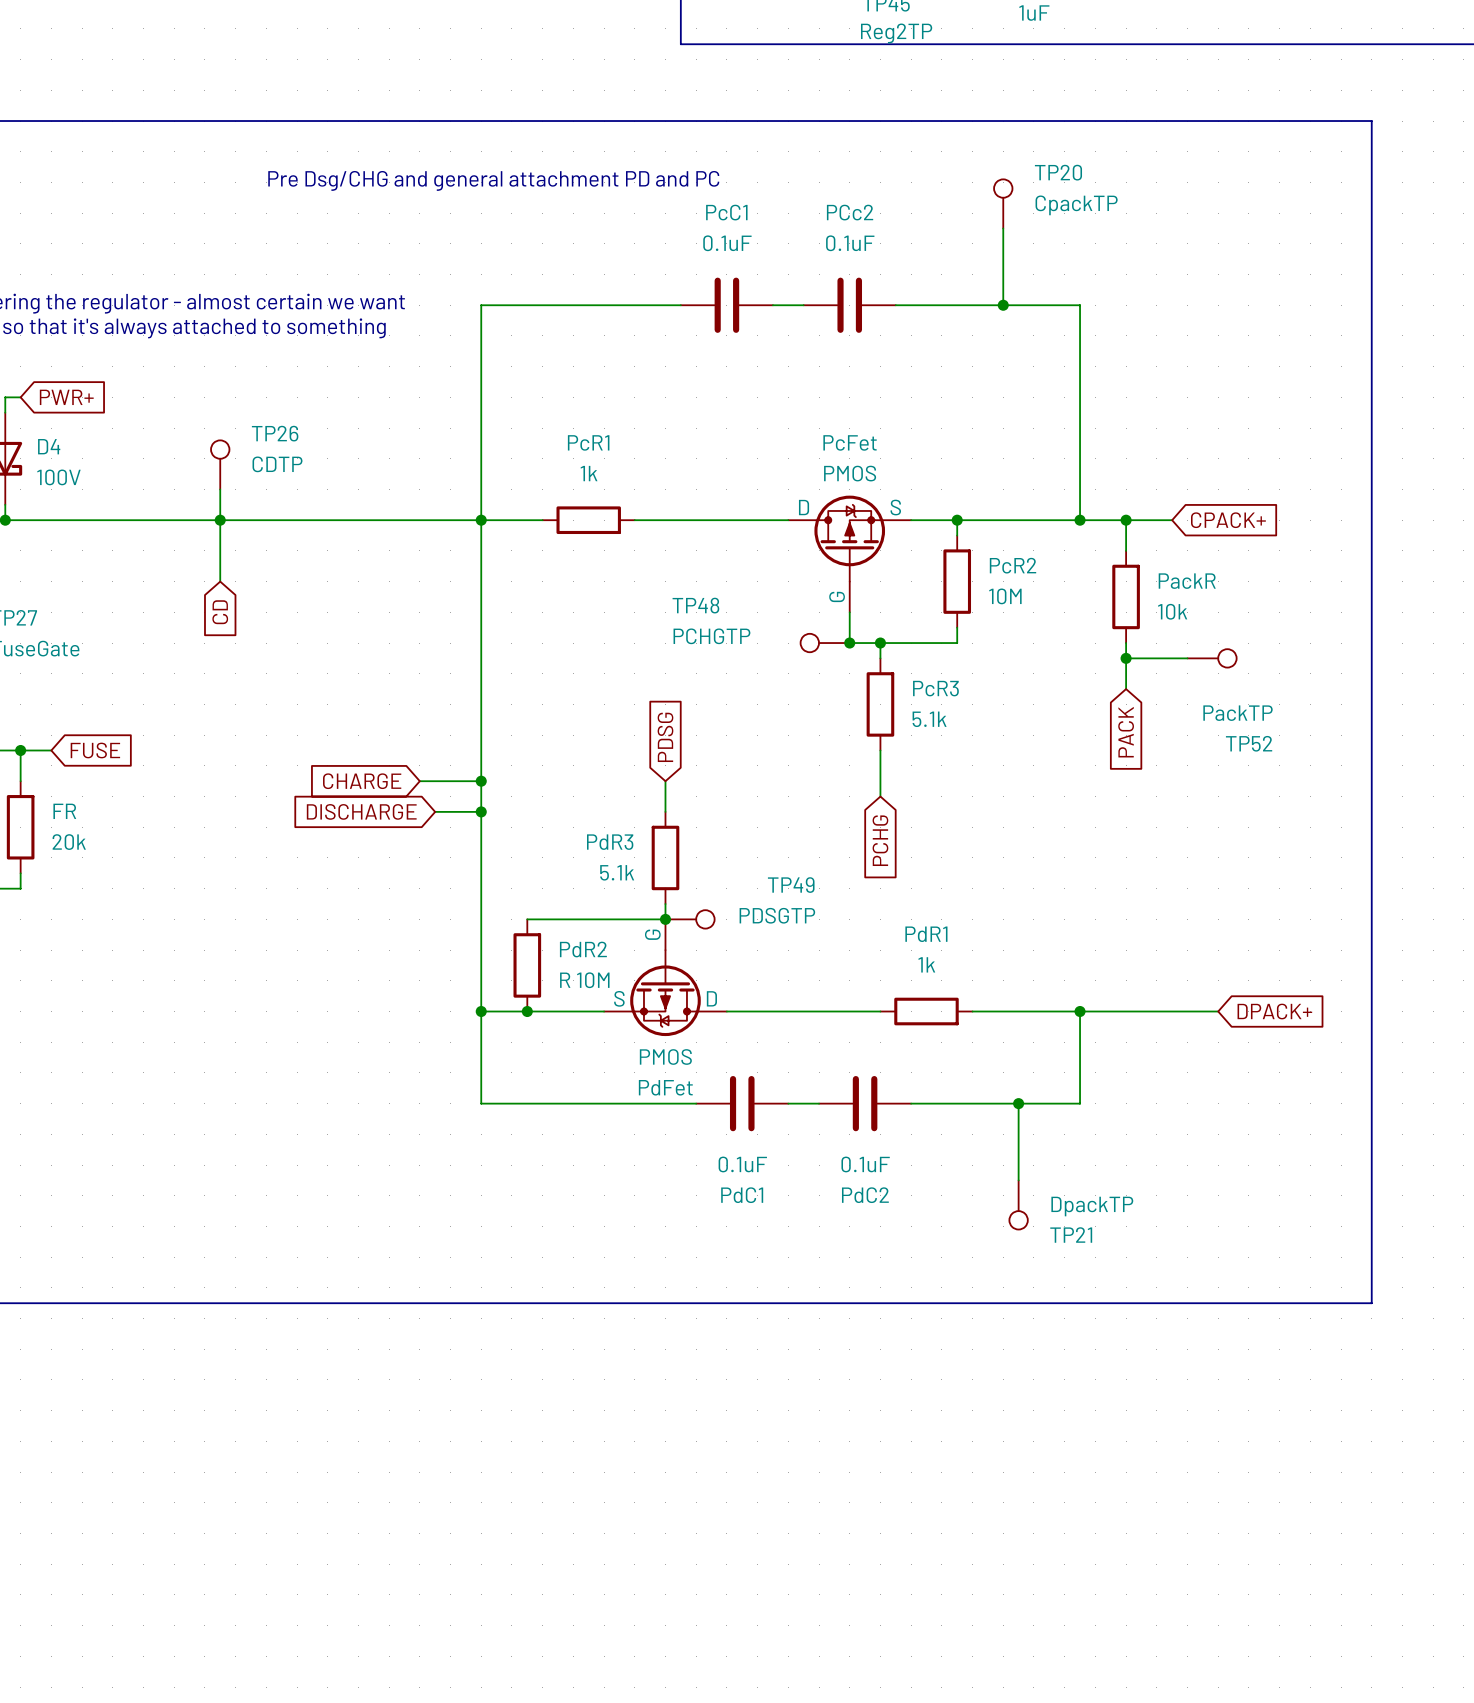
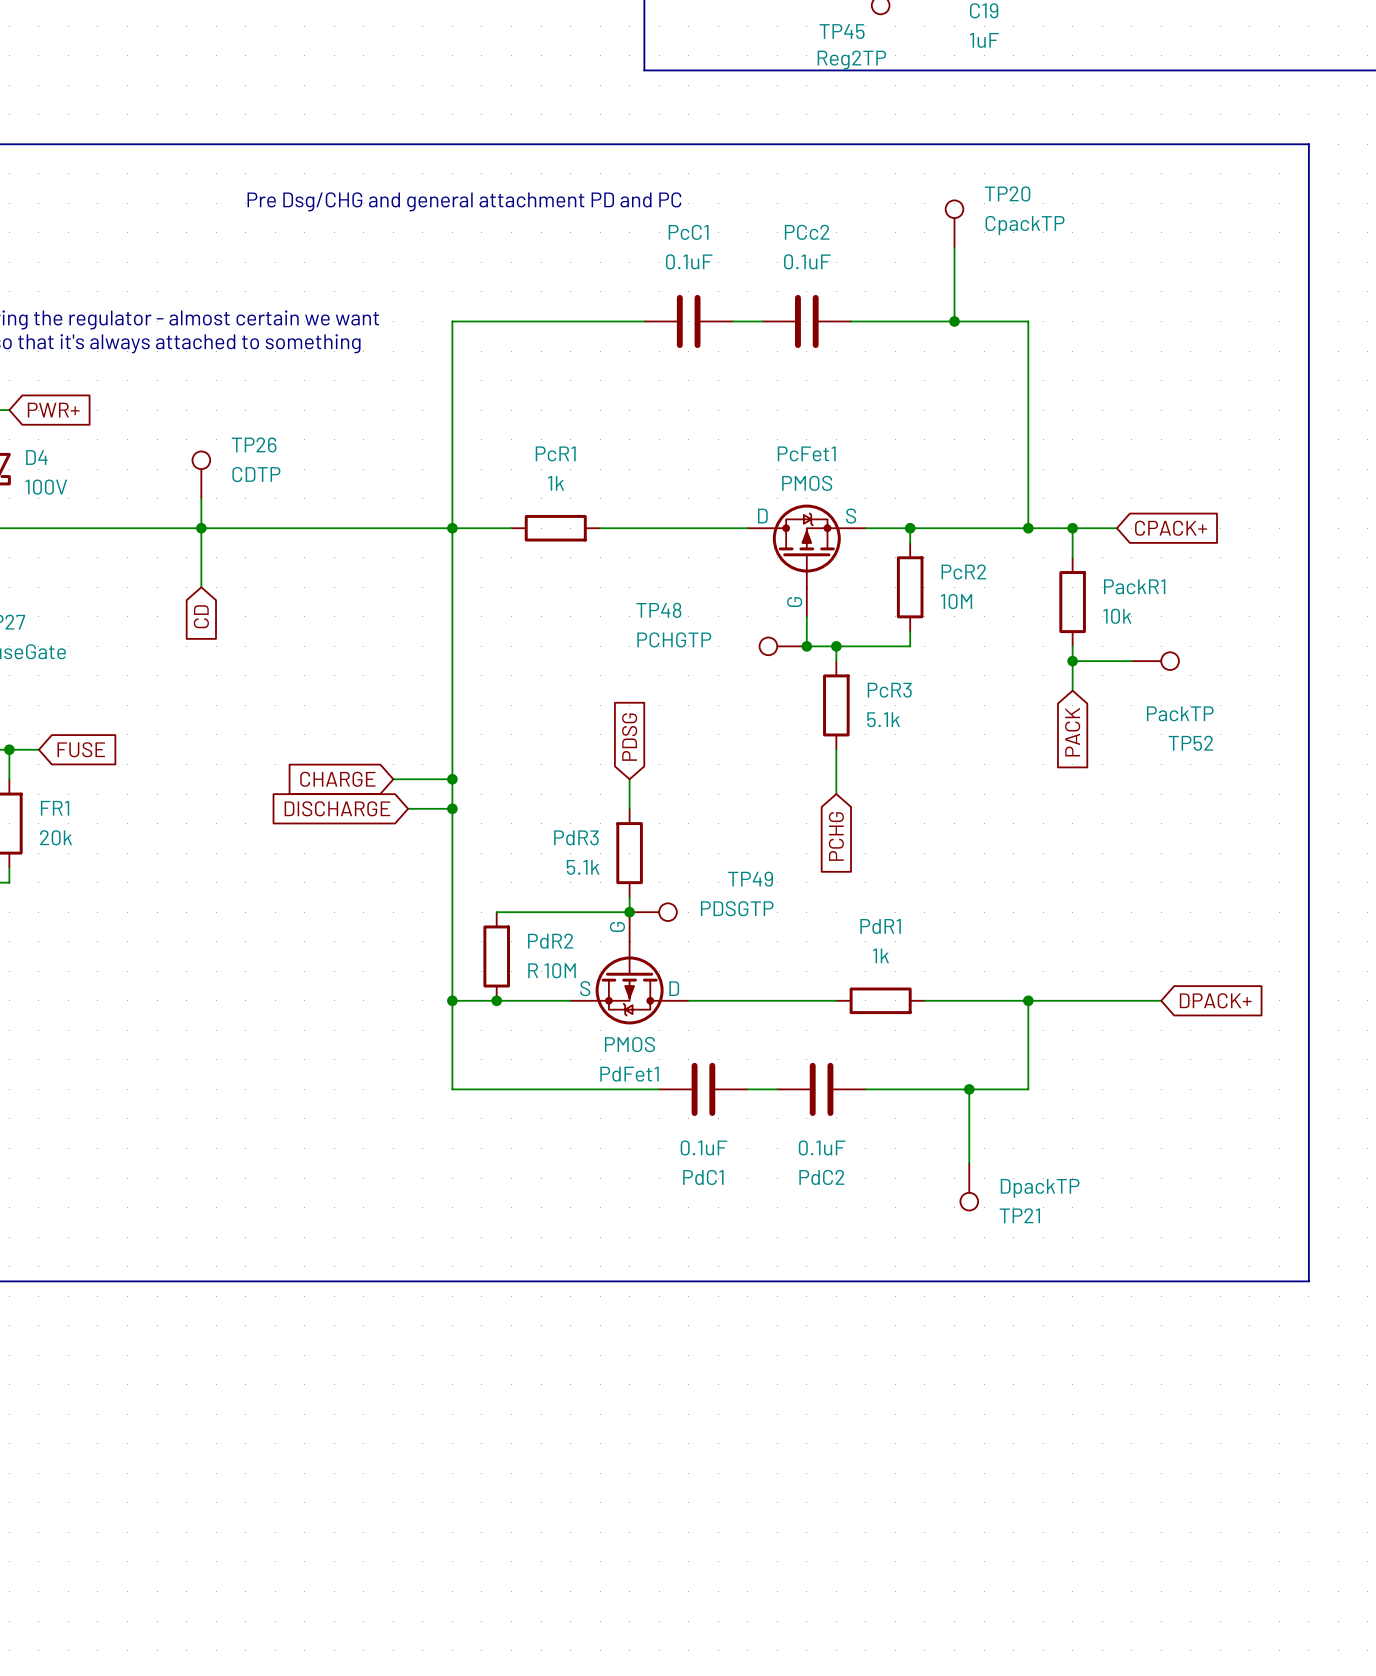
PcFet name: PcFet (850, 442) -> PcFet1 (806, 453)
PackR name: PackR (1187, 581) -> PackR1 (1134, 586)
FR name: FR (64, 811) -> FR1 (55, 808)
PdFet name: PdFet (665, 1087) -> PdFet1 (629, 1074)

